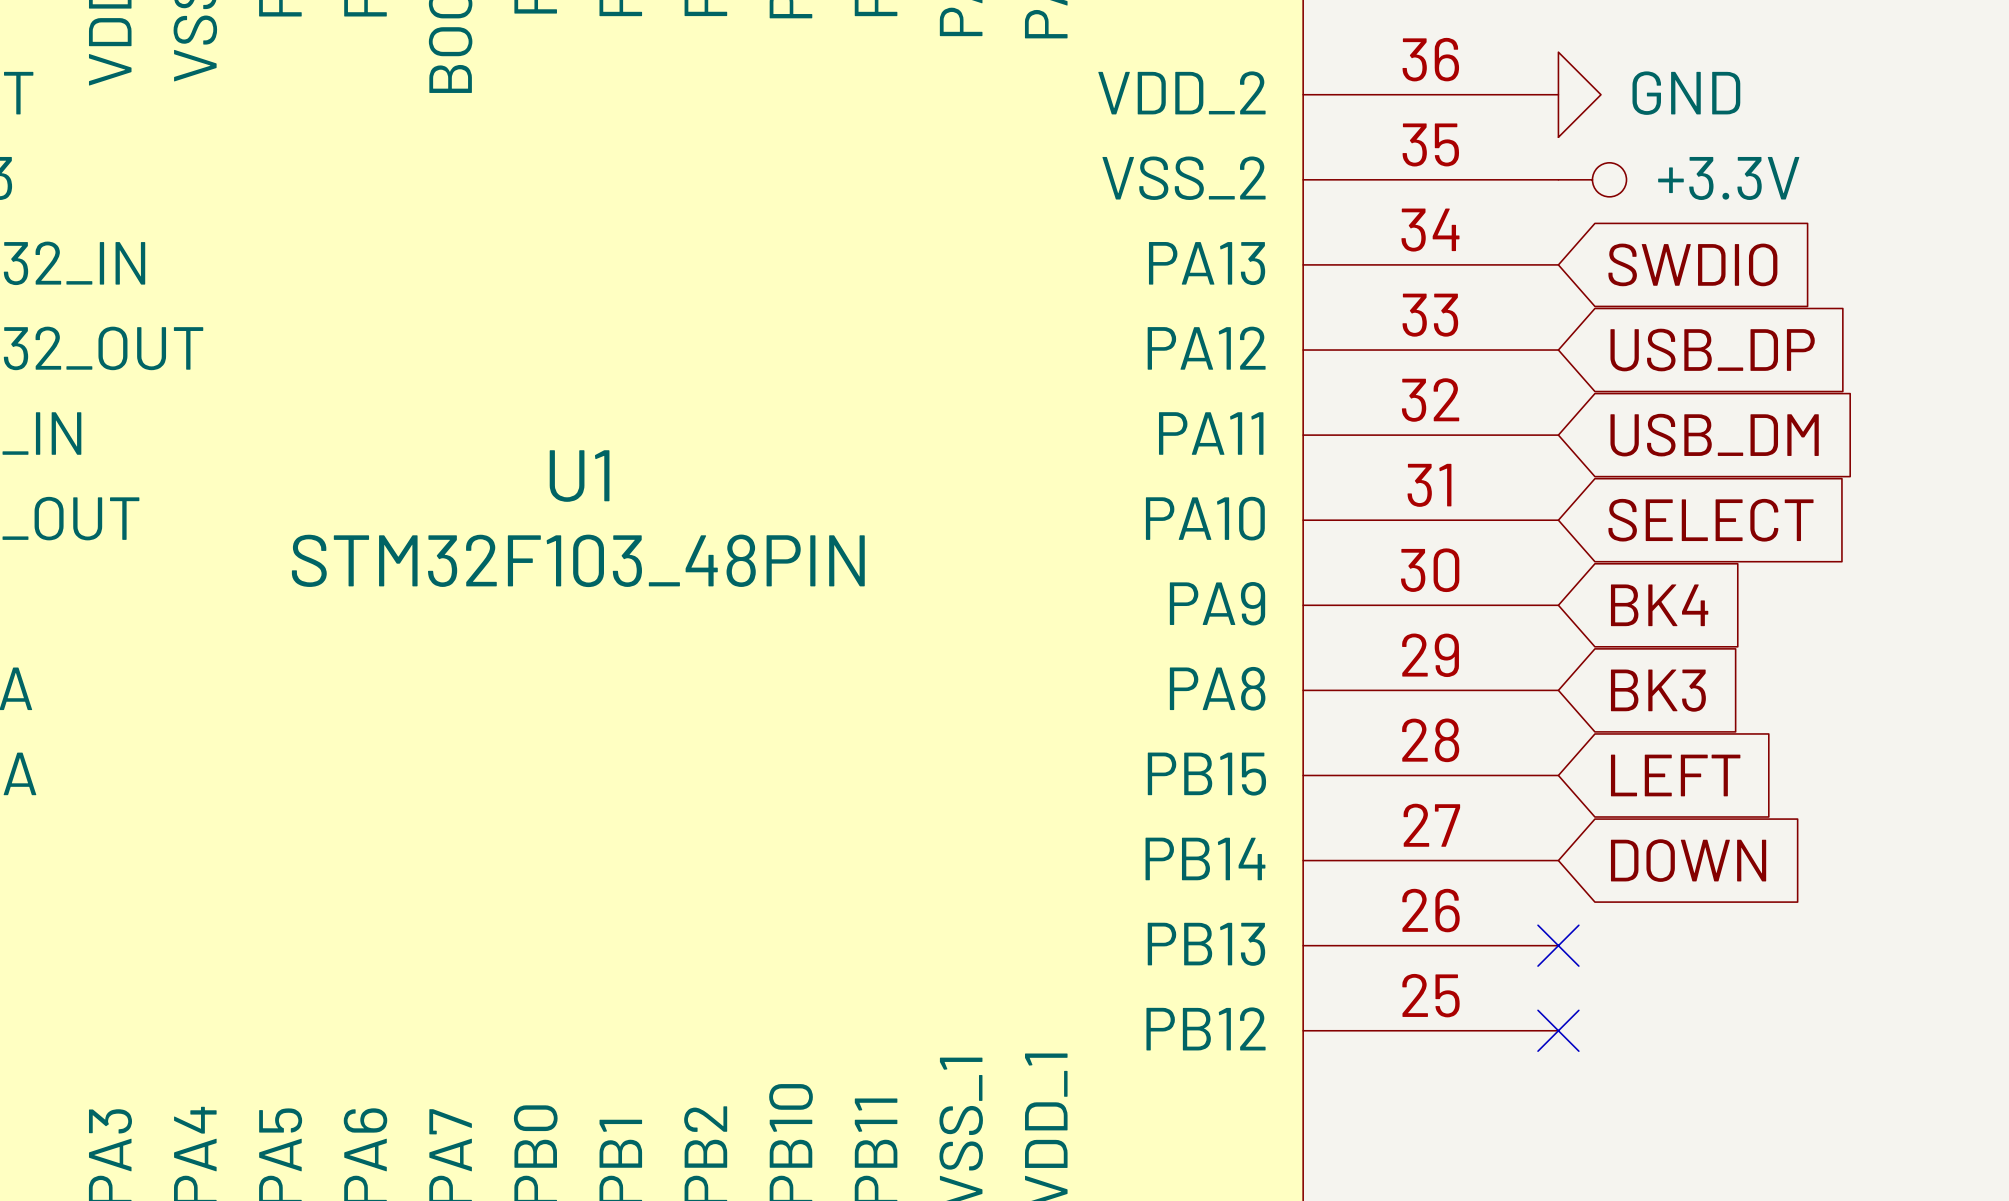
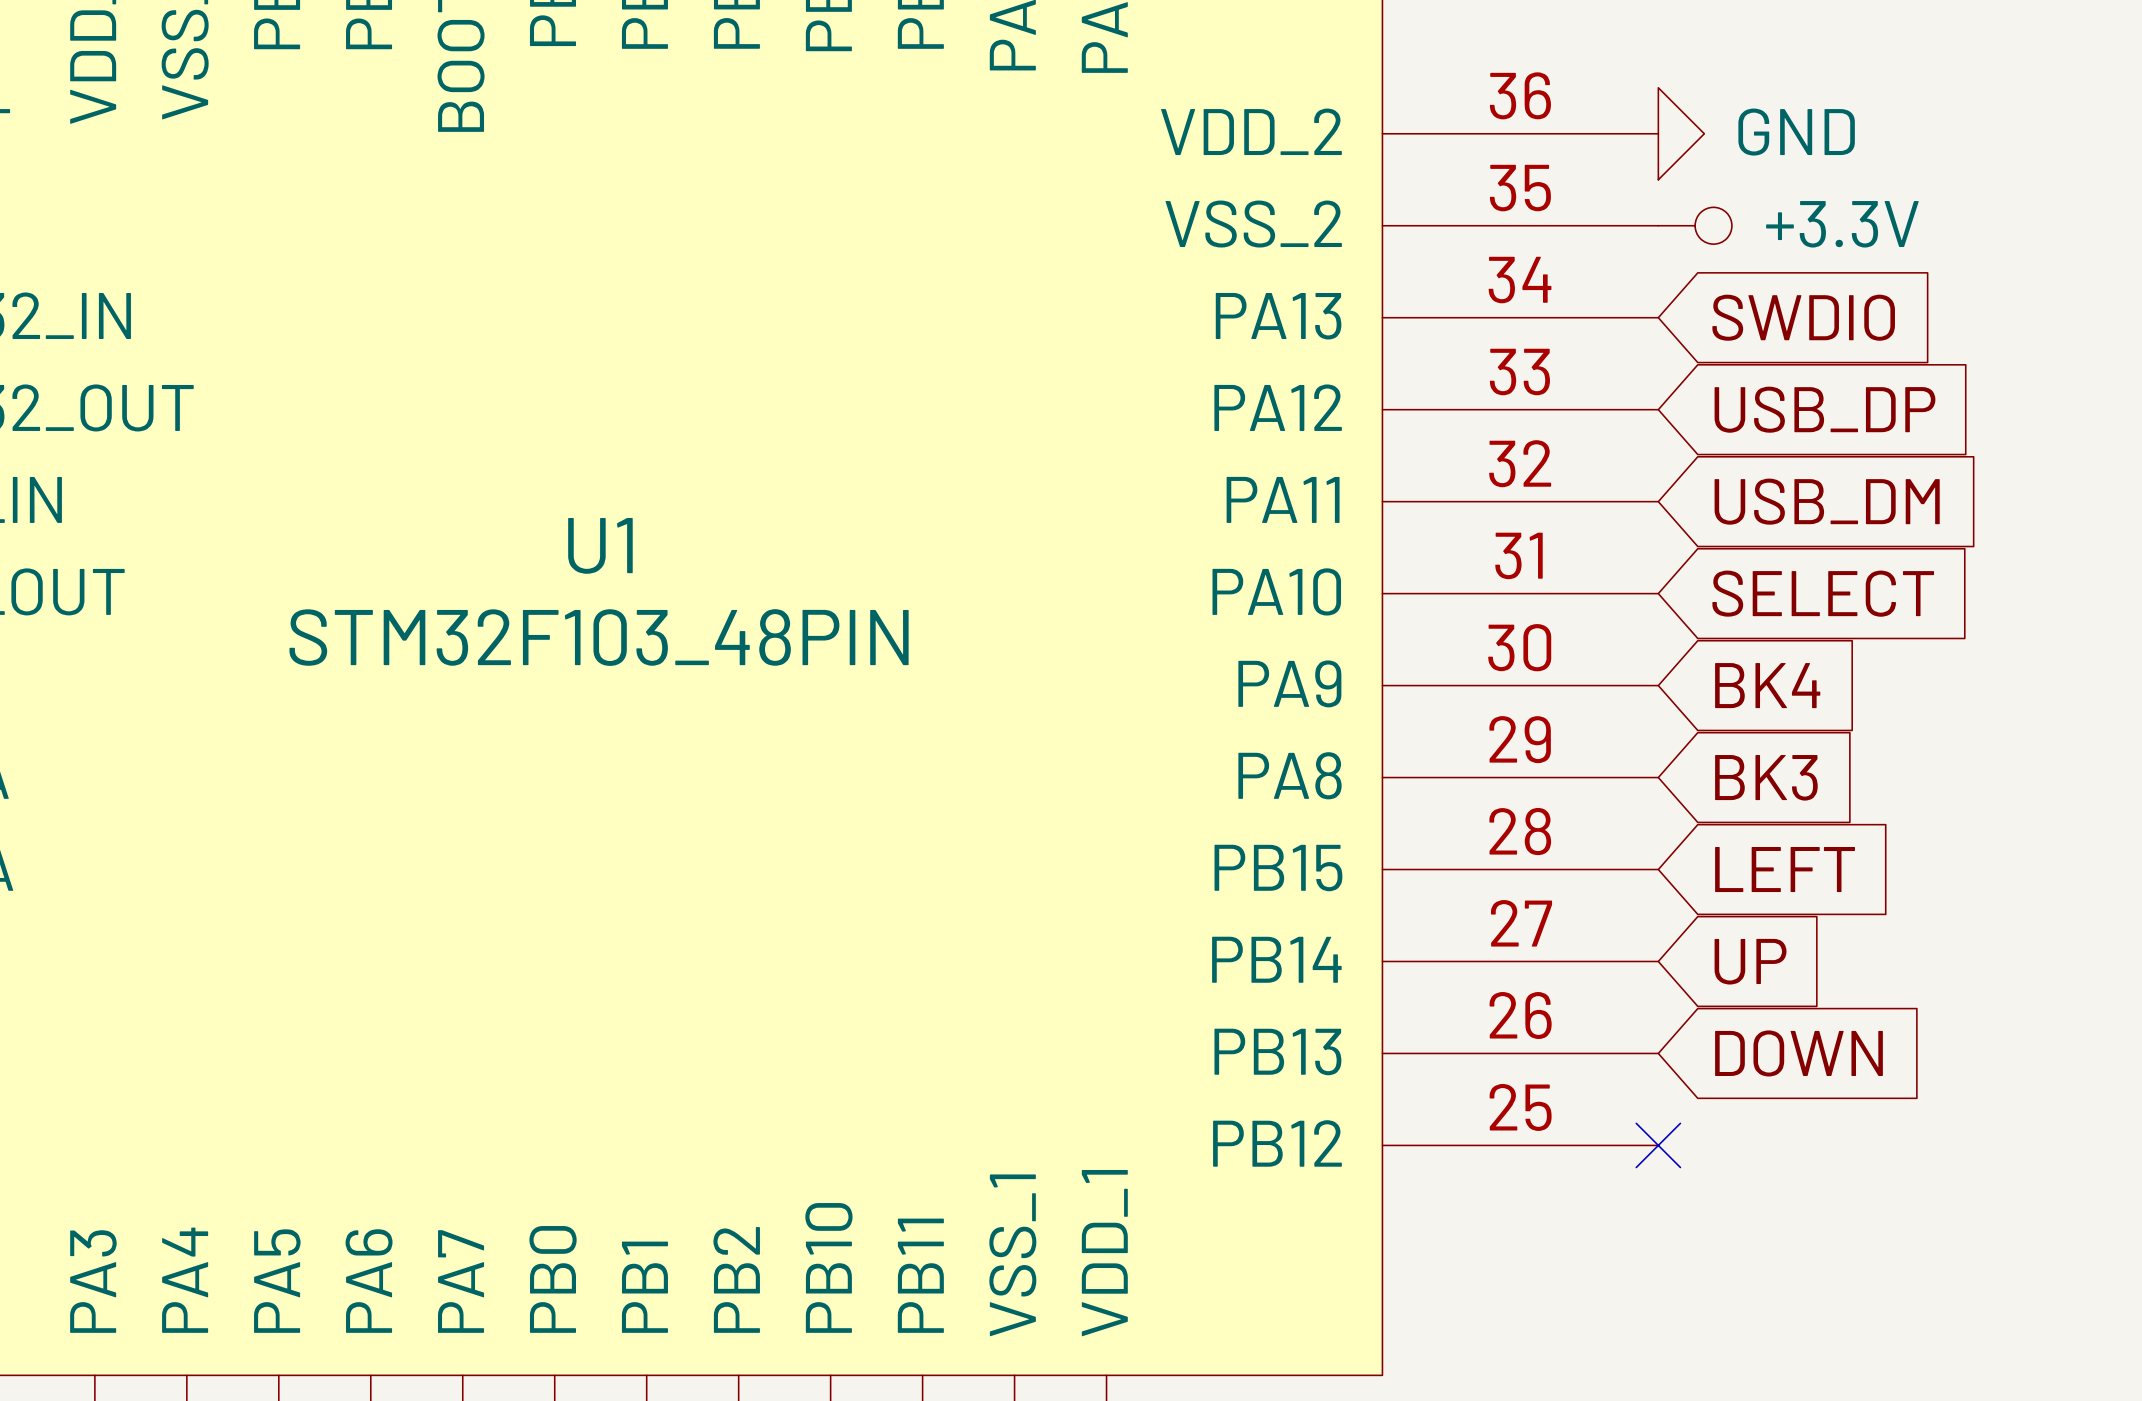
global label: DOWN (1688, 860) -> UP (1750, 961)
no-connect mark: (1558, 945) -> none
global label: none -> DOWN (1798, 1053)

